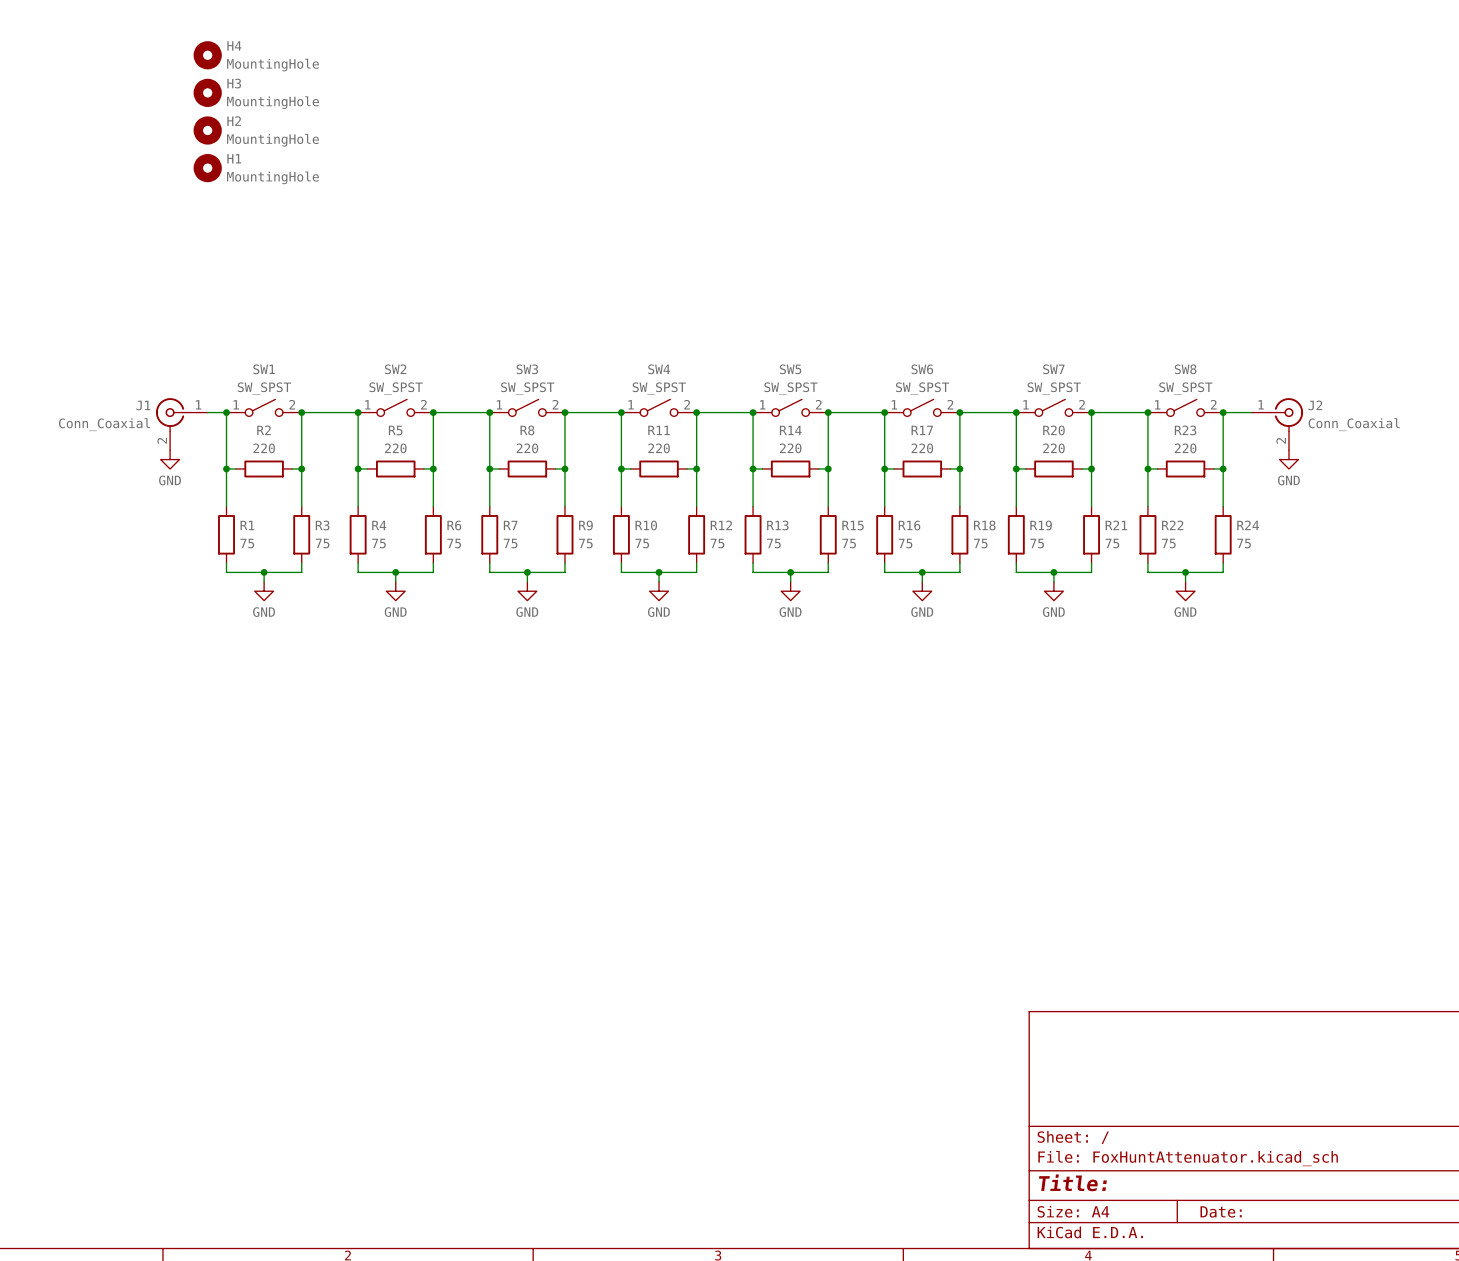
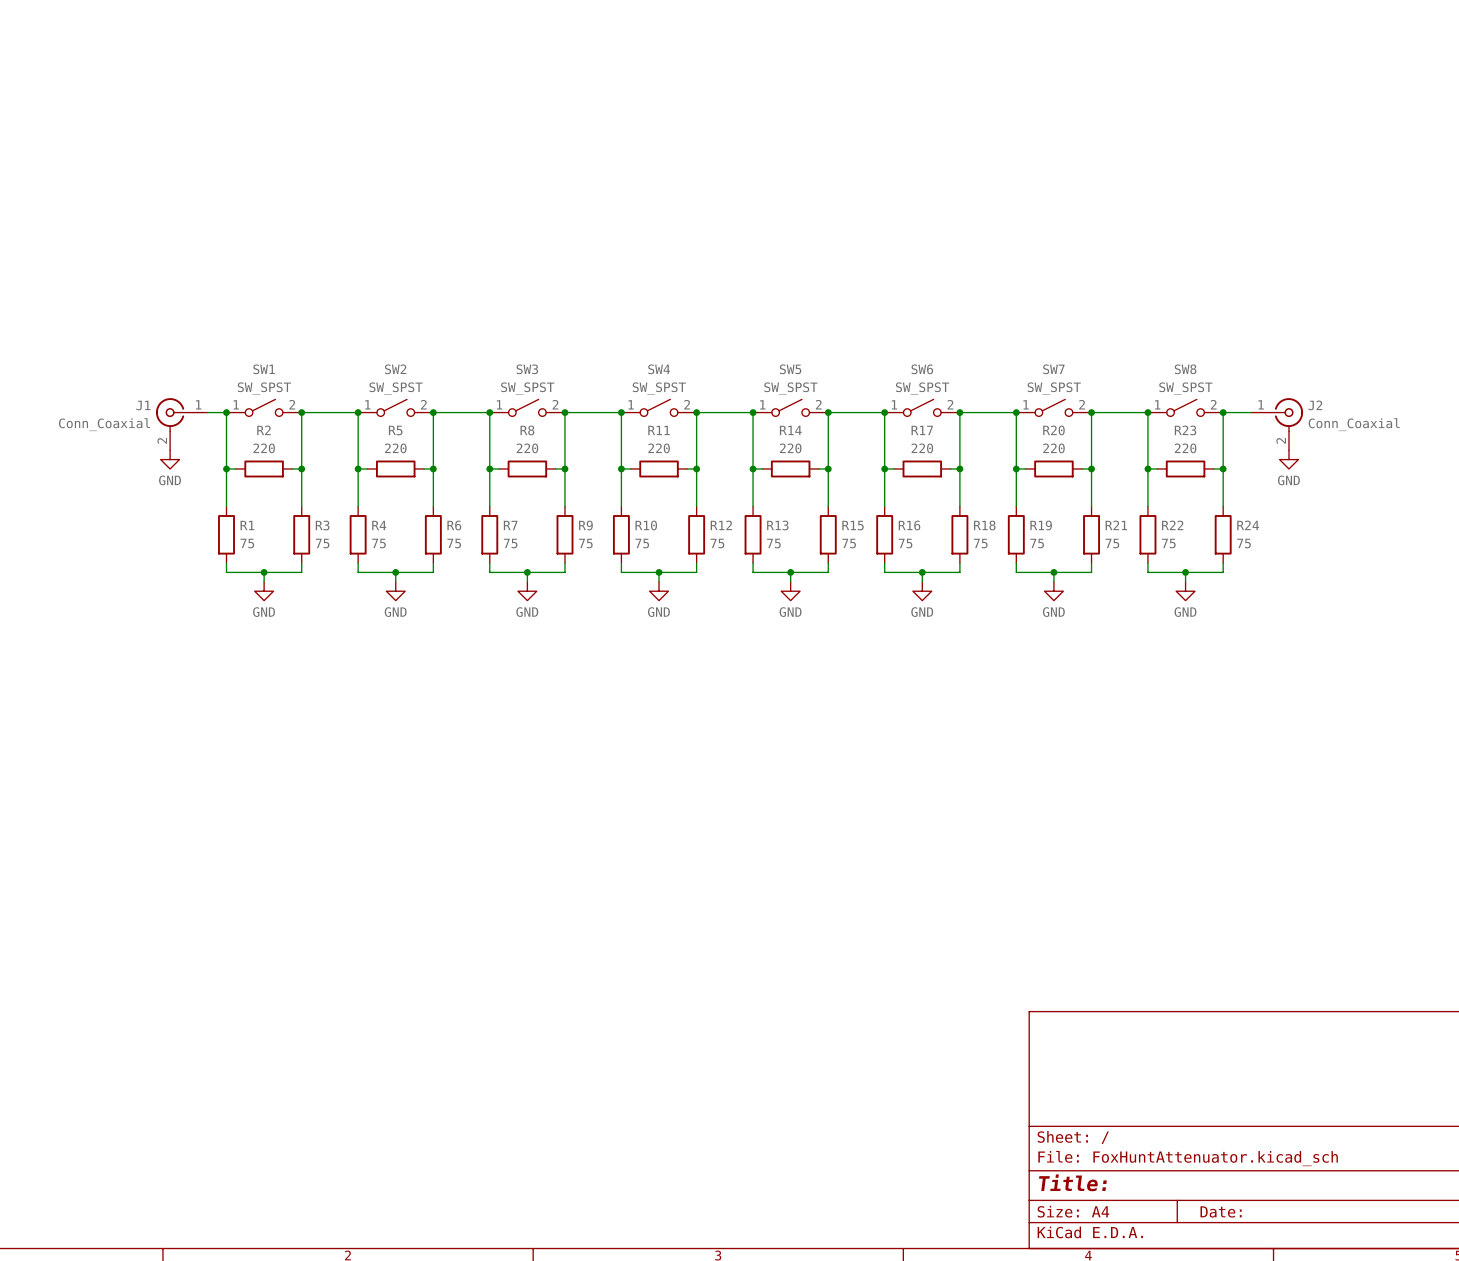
H4: MountingHole (207, 55) -> none
H3: MountingHole (207, 92) -> none
H2: MountingHole (207, 130) -> none
H1: MountingHole (207, 168) -> none

